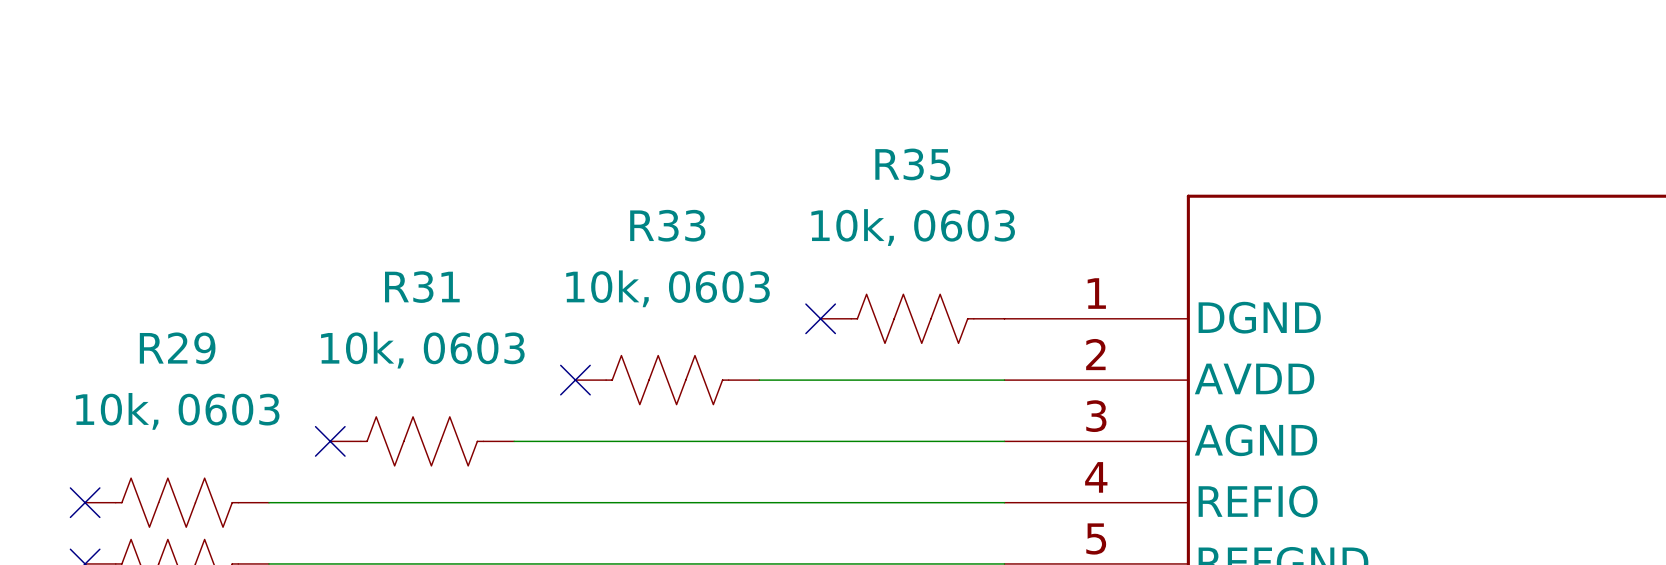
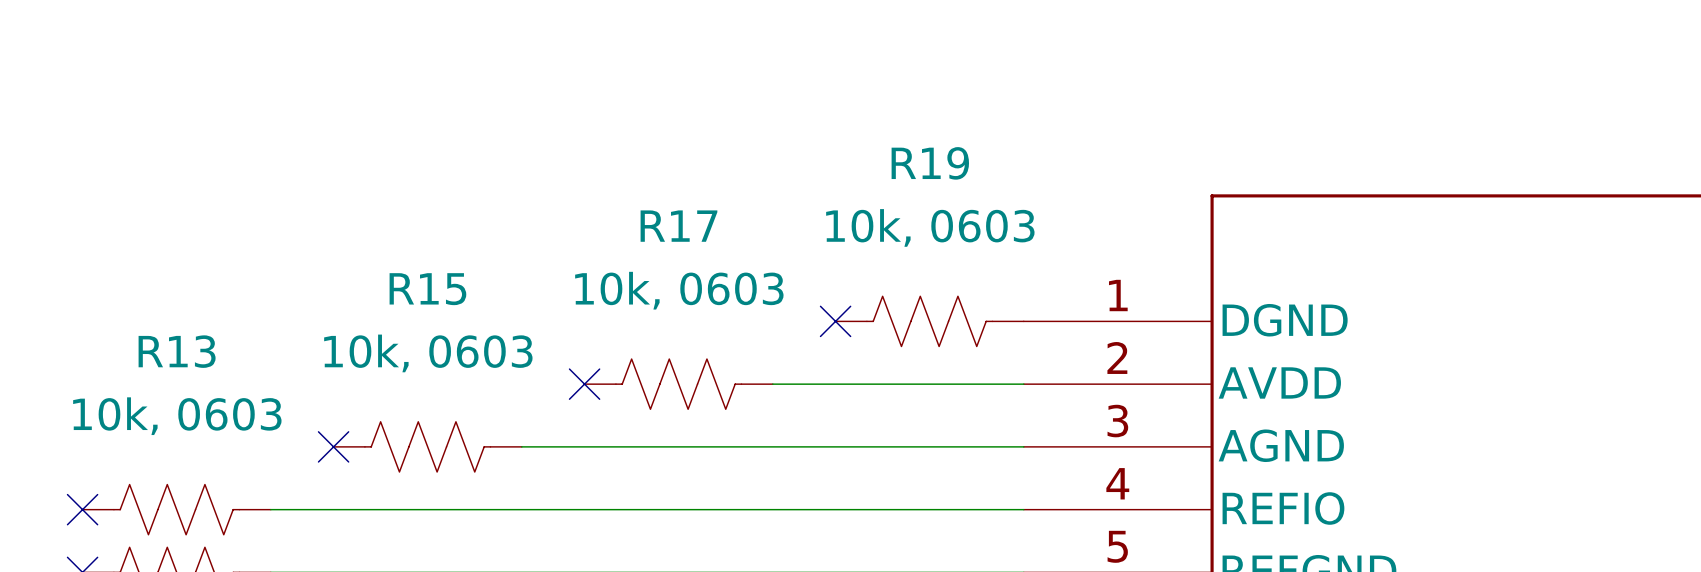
R35 name: R35 (912, 164) -> R19 (930, 163)
R33 name: R33 (667, 225) -> R17 (678, 226)
R31 name: R31 (422, 287) -> R15 (427, 289)
R29 name: R29 (177, 348) -> R13 (177, 351)

